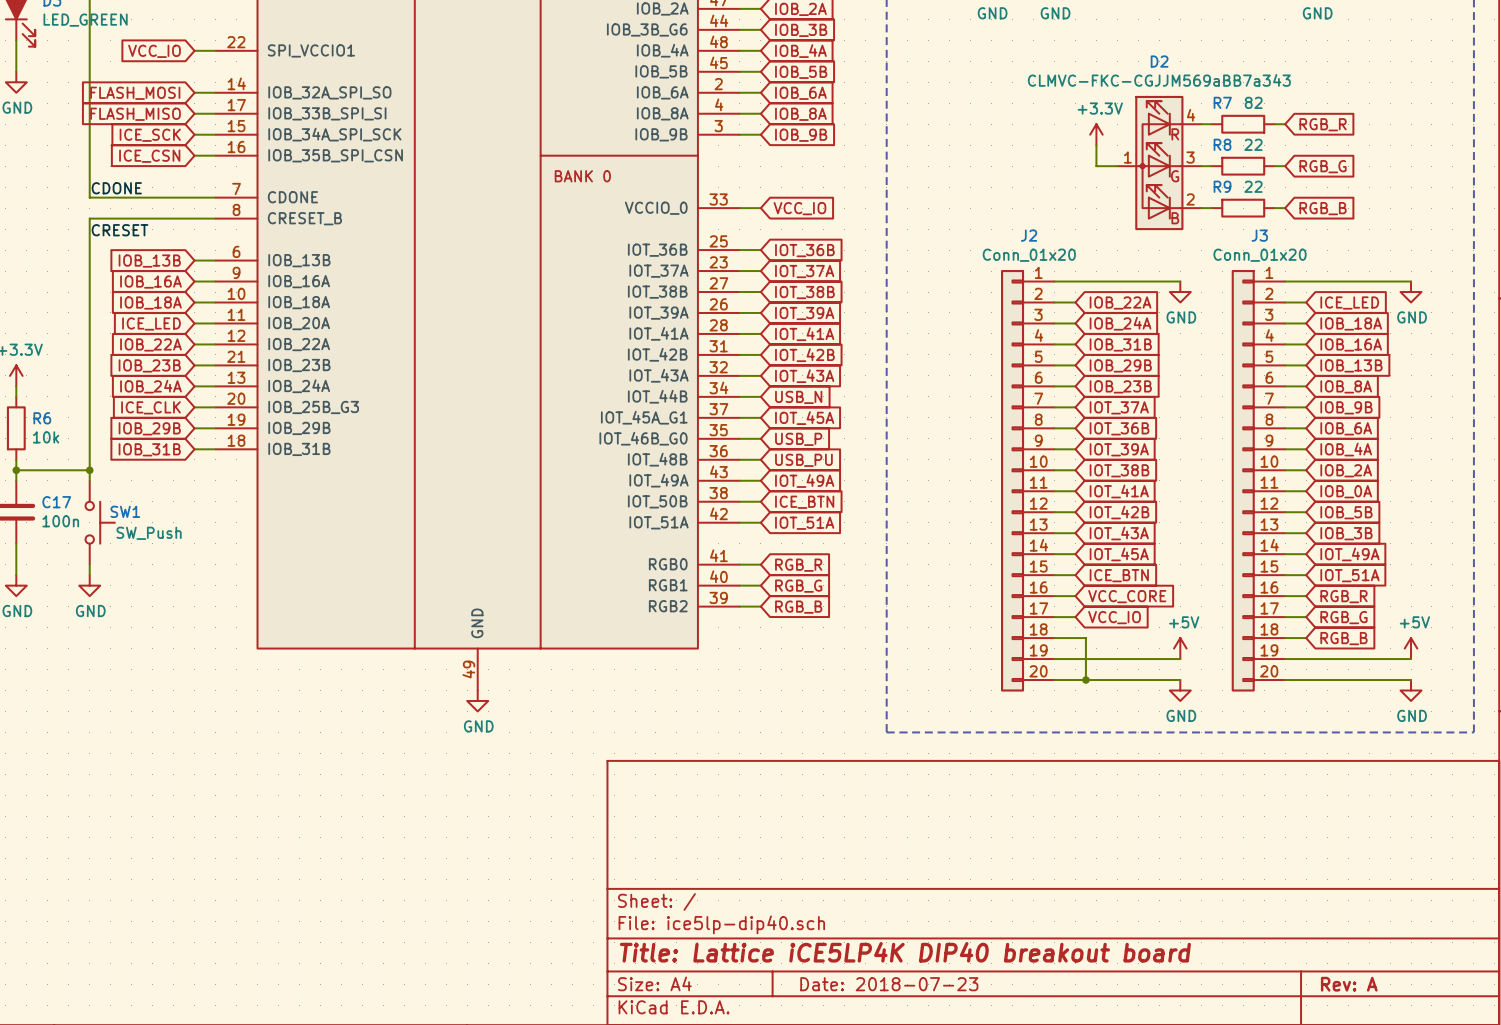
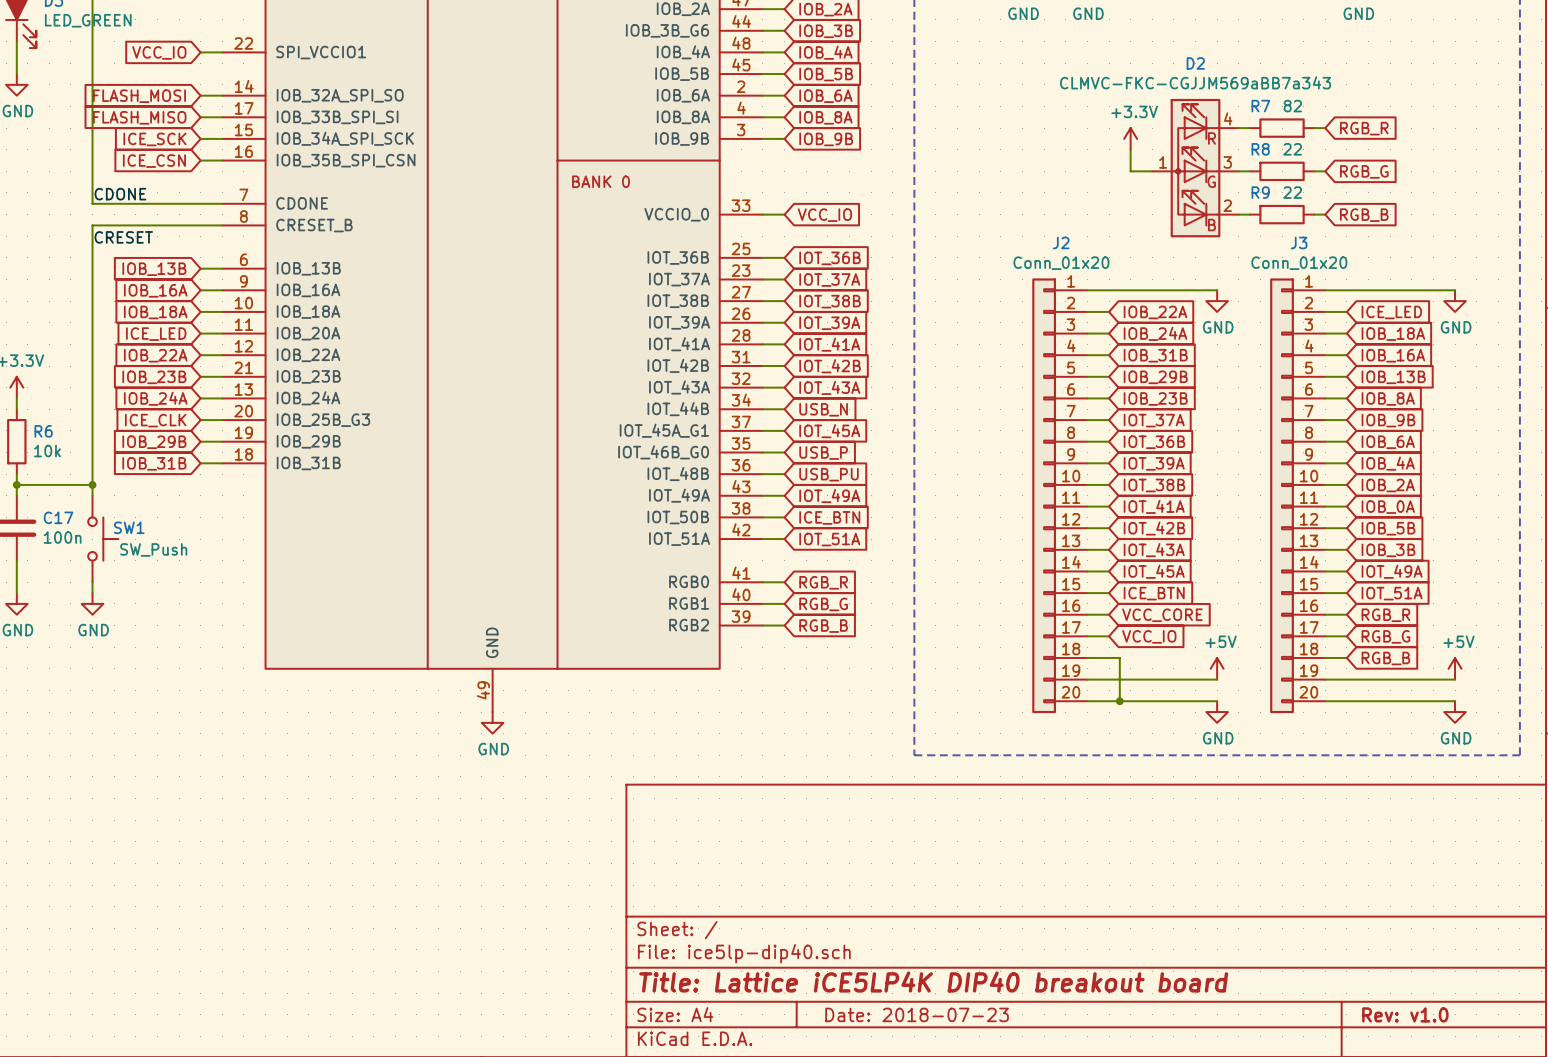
title block: Rev: A (1349, 984) -> Rev: v1.0 (1405, 1014)

